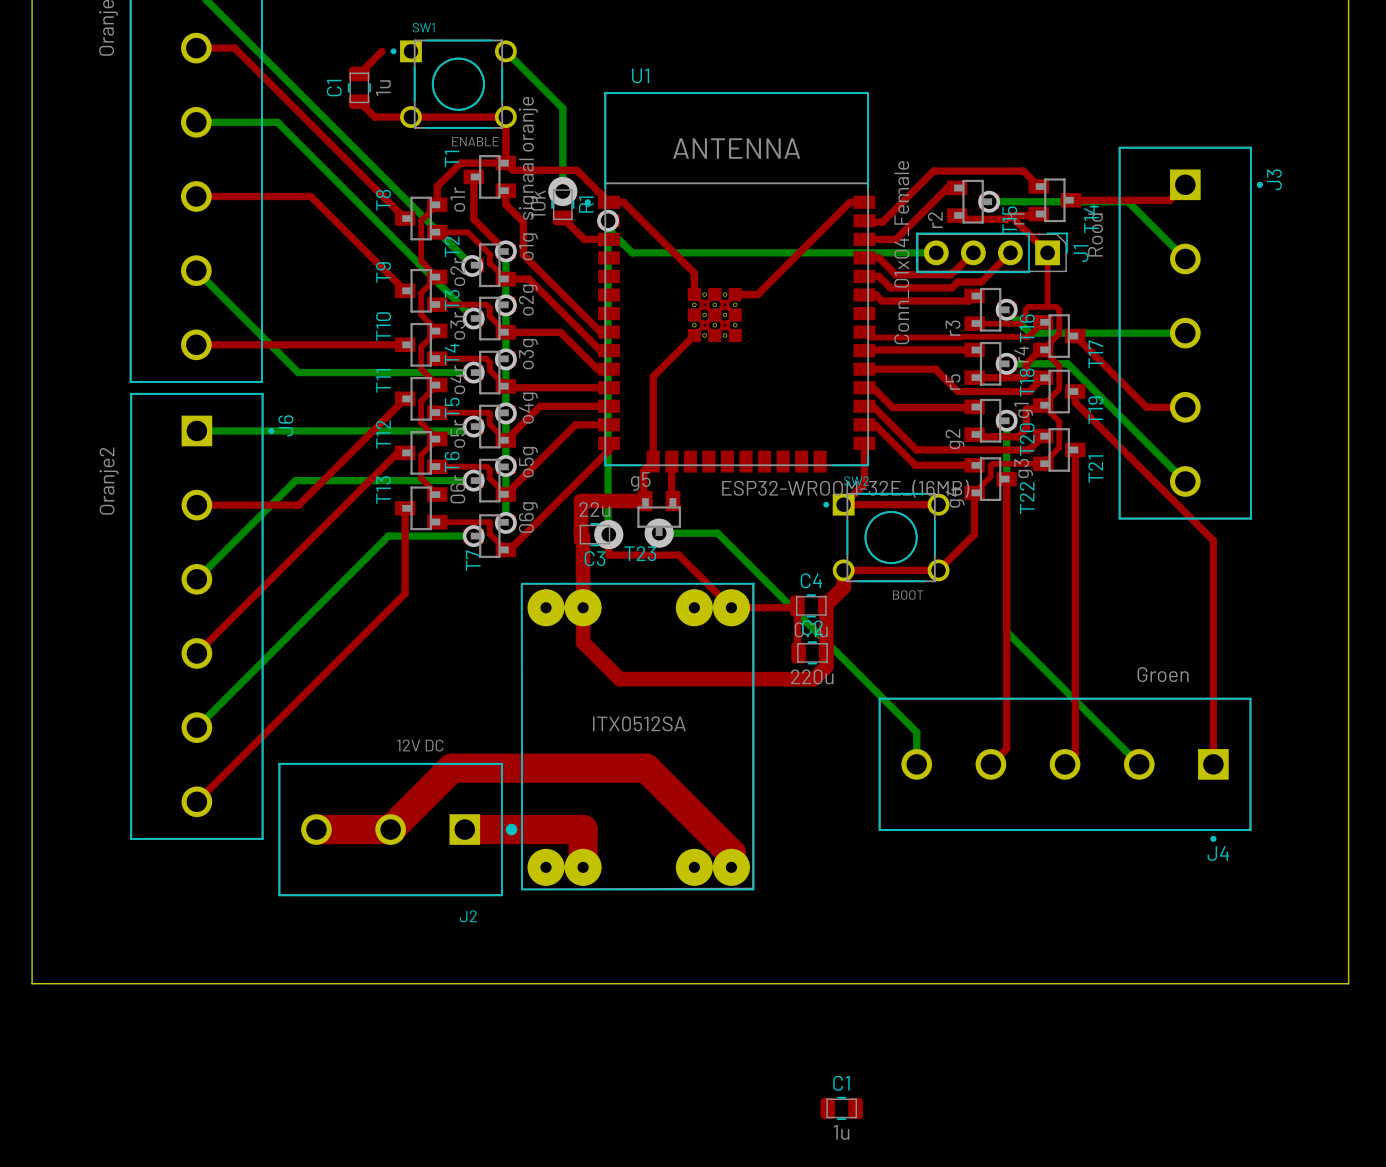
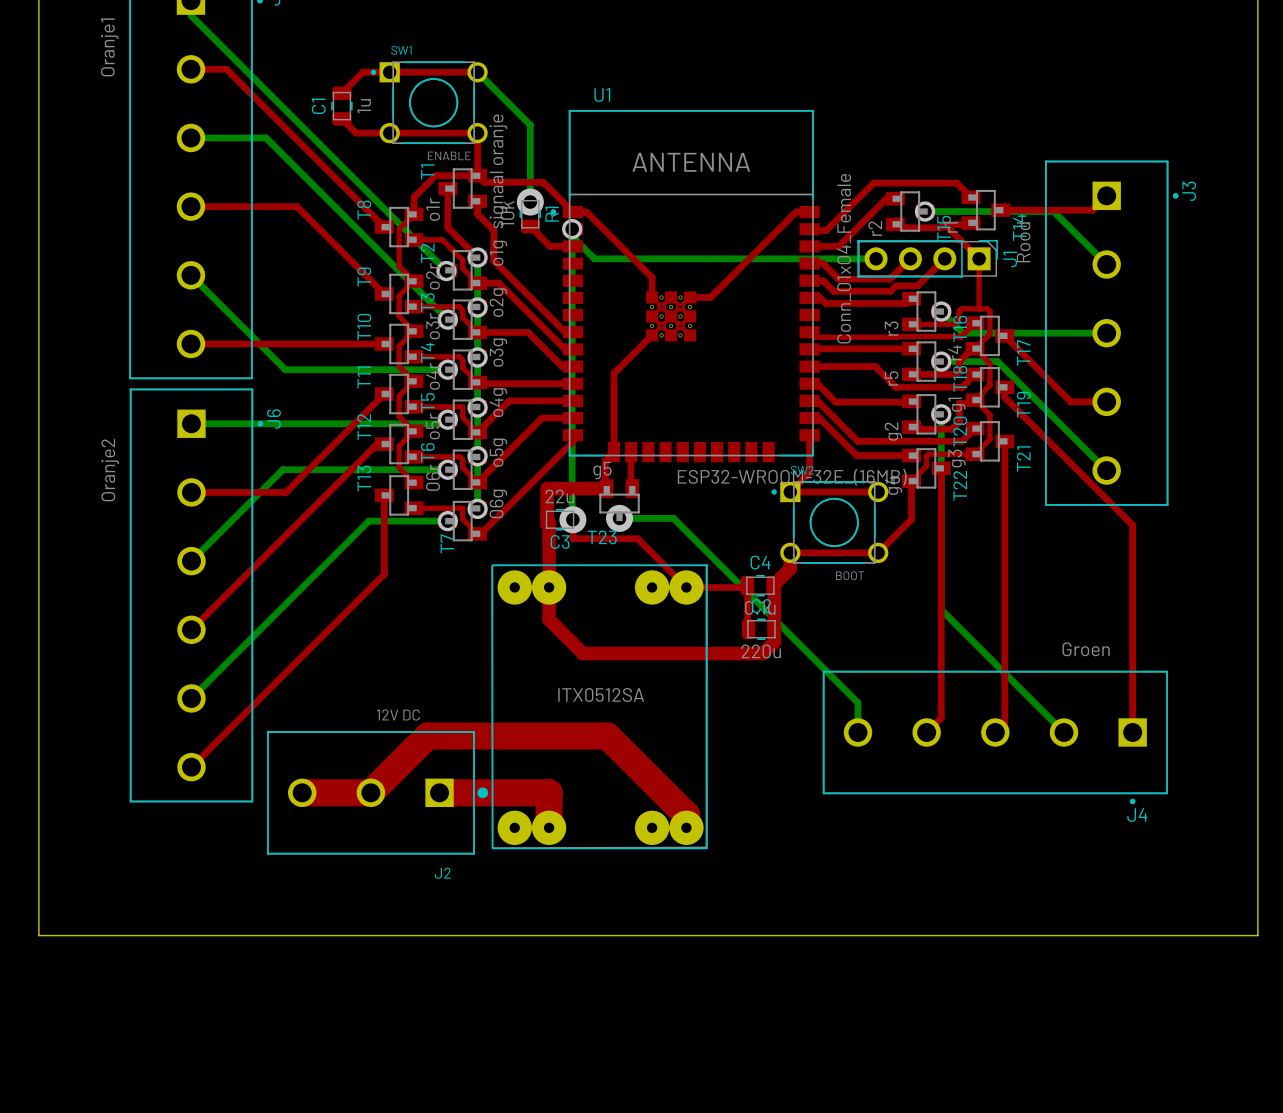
top track: none -> (362, 72) (477, 72)
C1: 1u (841, 1108) -> none

